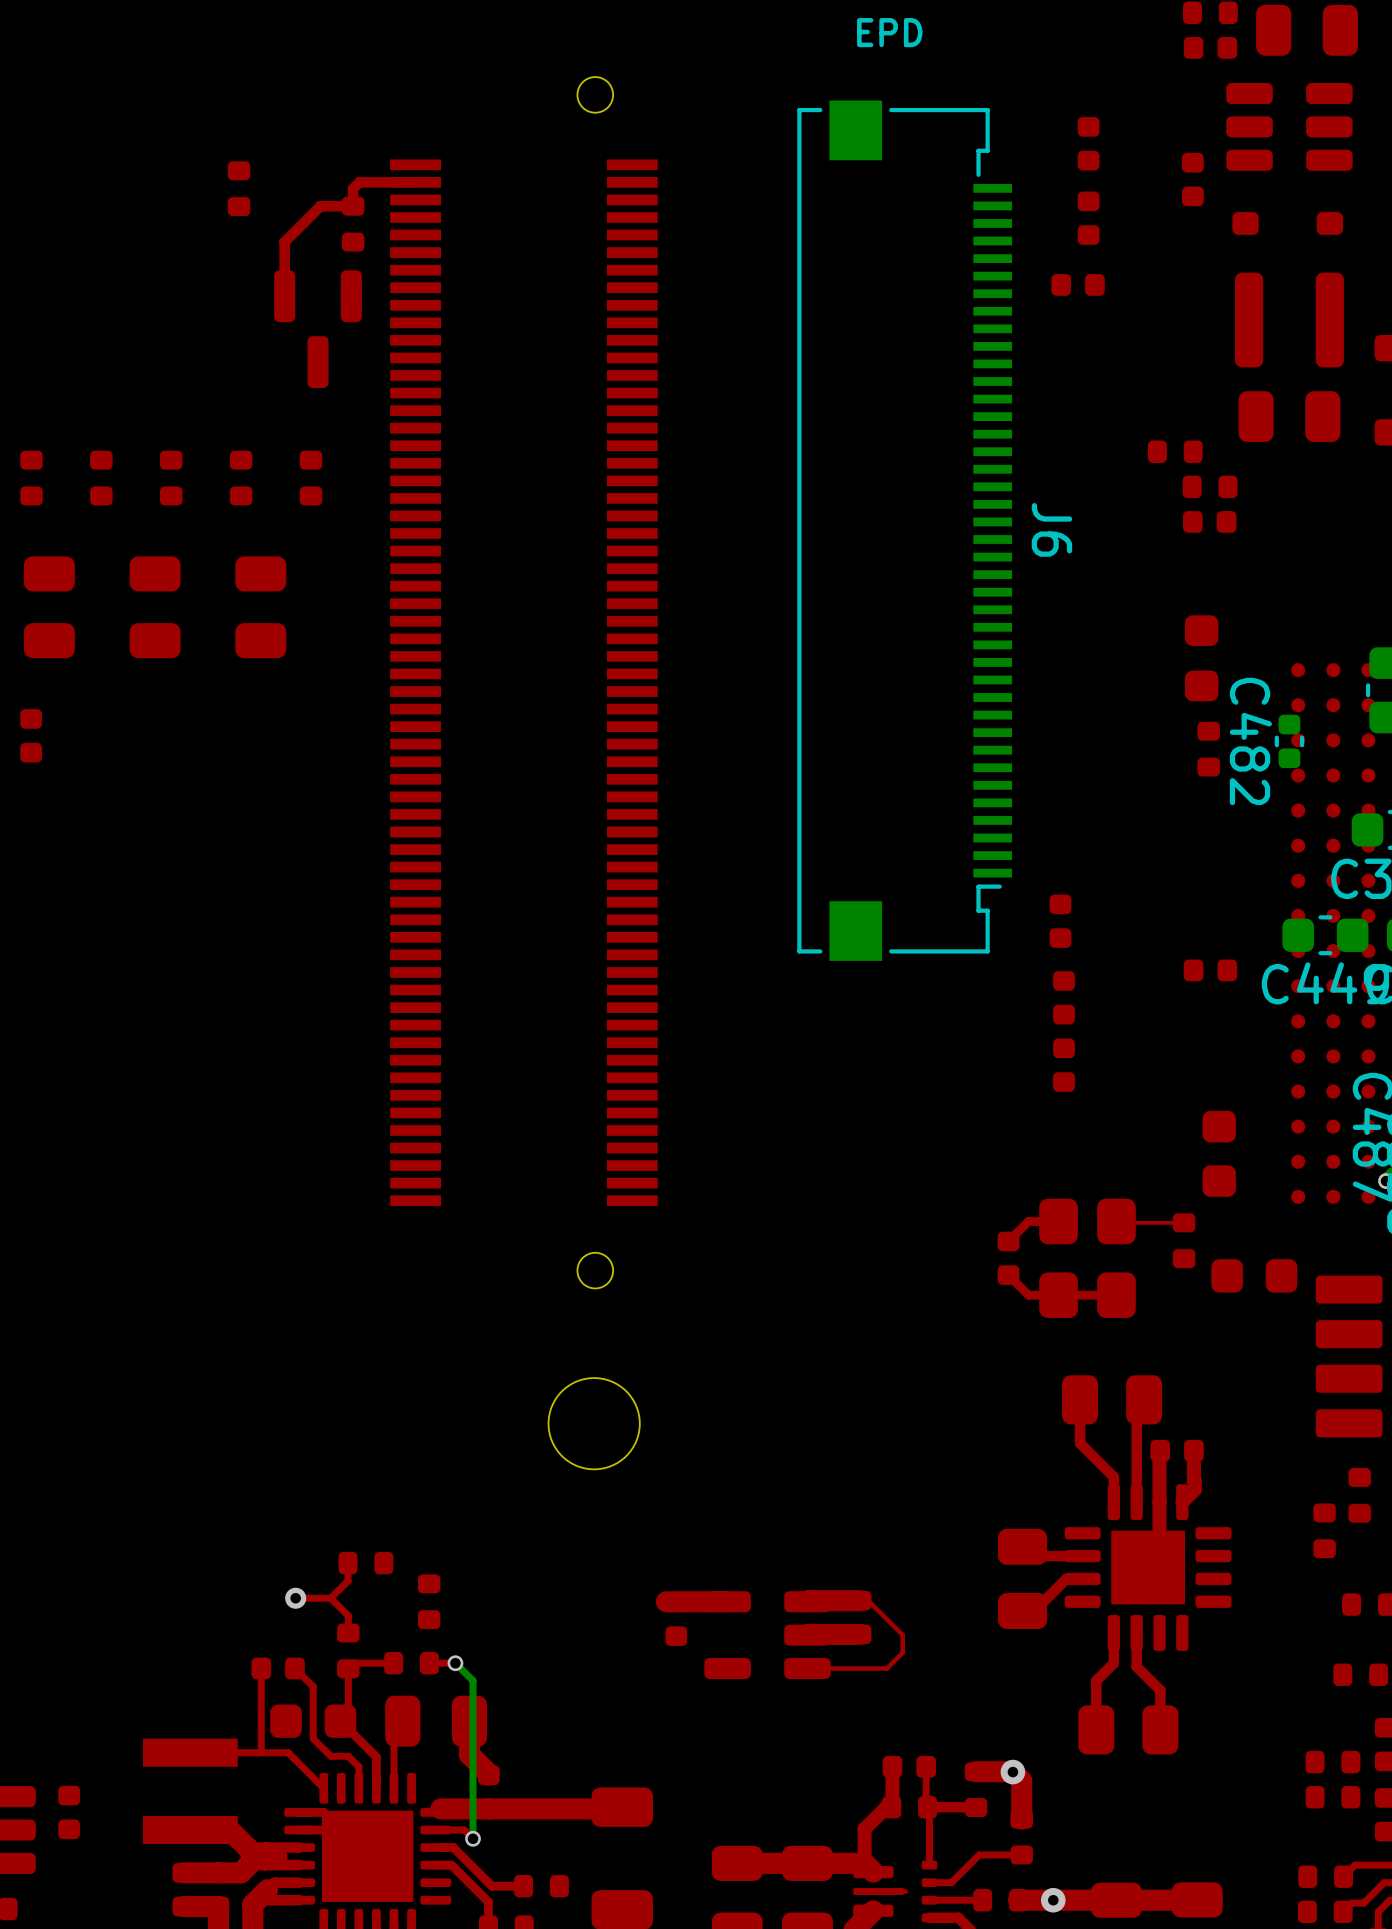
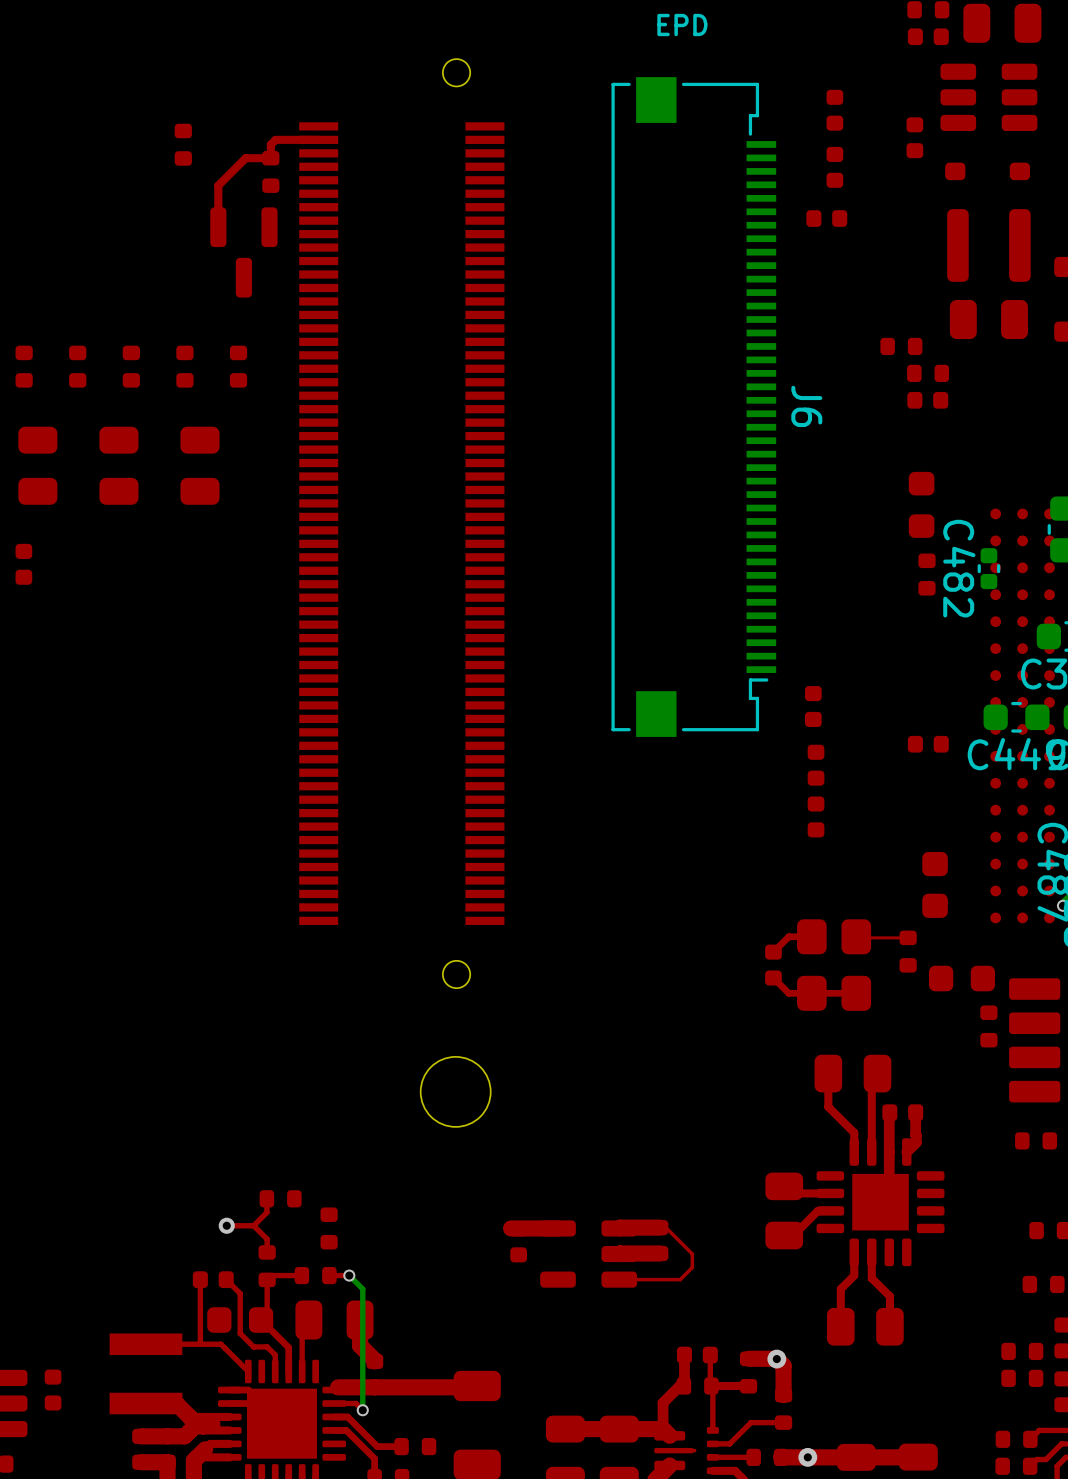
part: none -> (988, 1026)
part rotation: 0° (1359, 1495) -> 90° clockwise (1036, 1140)
part: (1324, 1530) -> none

